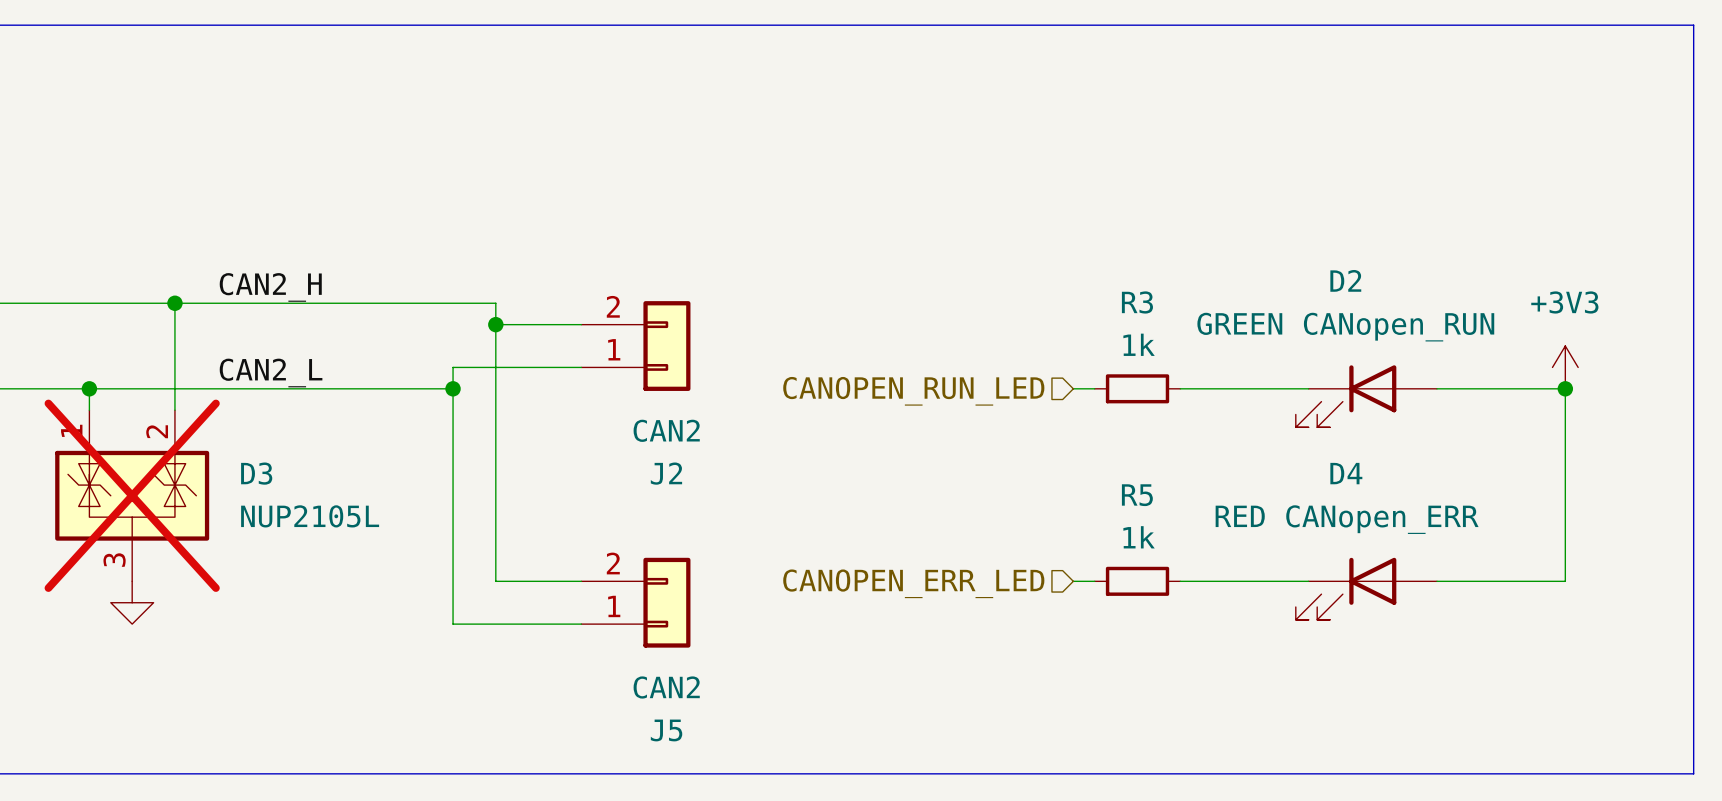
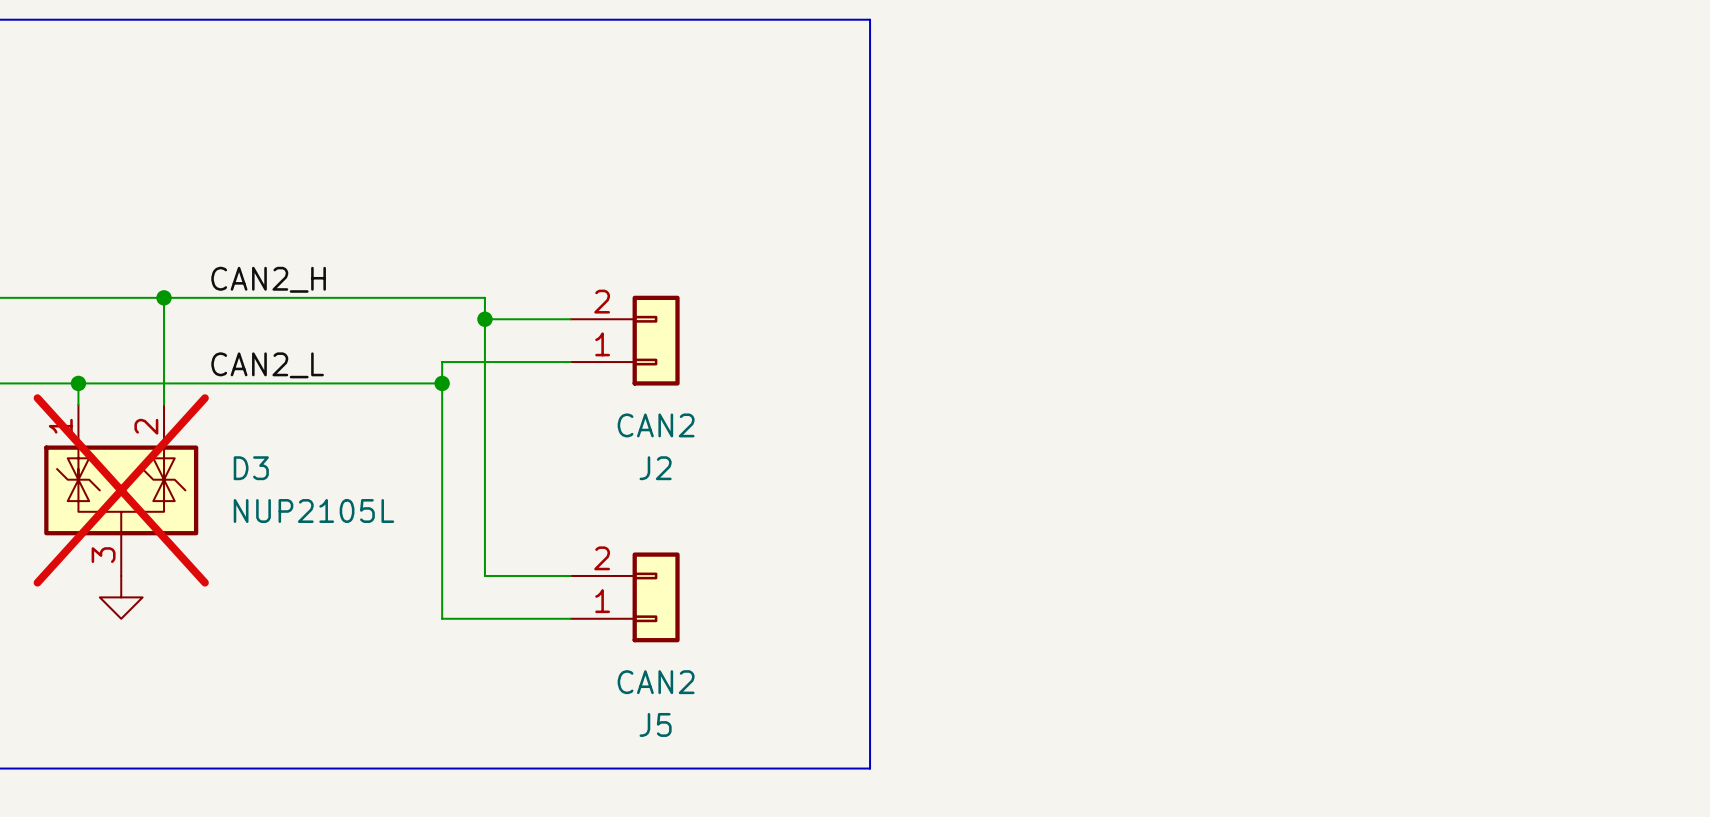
line: (880, 25) (1693, 25) (1693, 773) (880, 773) -> (870, 19) (870, 768)
power symbol: +3V3 (1565, 367) -> none
wire: (1073, 388) (1094, 388) -> none
R3: 1k (1137, 388) -> none
wire: (1180, 388) (1308, 388) -> none
wire: (1436, 388) (1565, 388) (1565, 581) (1436, 581) -> none
junction: (1565, 388) -> none
hierarchical label: CANOPEN_RUN_LED (913, 391) -> none
D2: GREEN CANopen_RUN (1366, 396) -> none
wire: (1073, 581) (1094, 581) -> none
R5: 1k (1137, 581) -> none
wire: (1180, 581) (1308, 581) -> none
hierarchical label: CANOPEN_ERR_LED (913, 583) -> none
D4: RED CANopen_ERR (1366, 588) -> none

